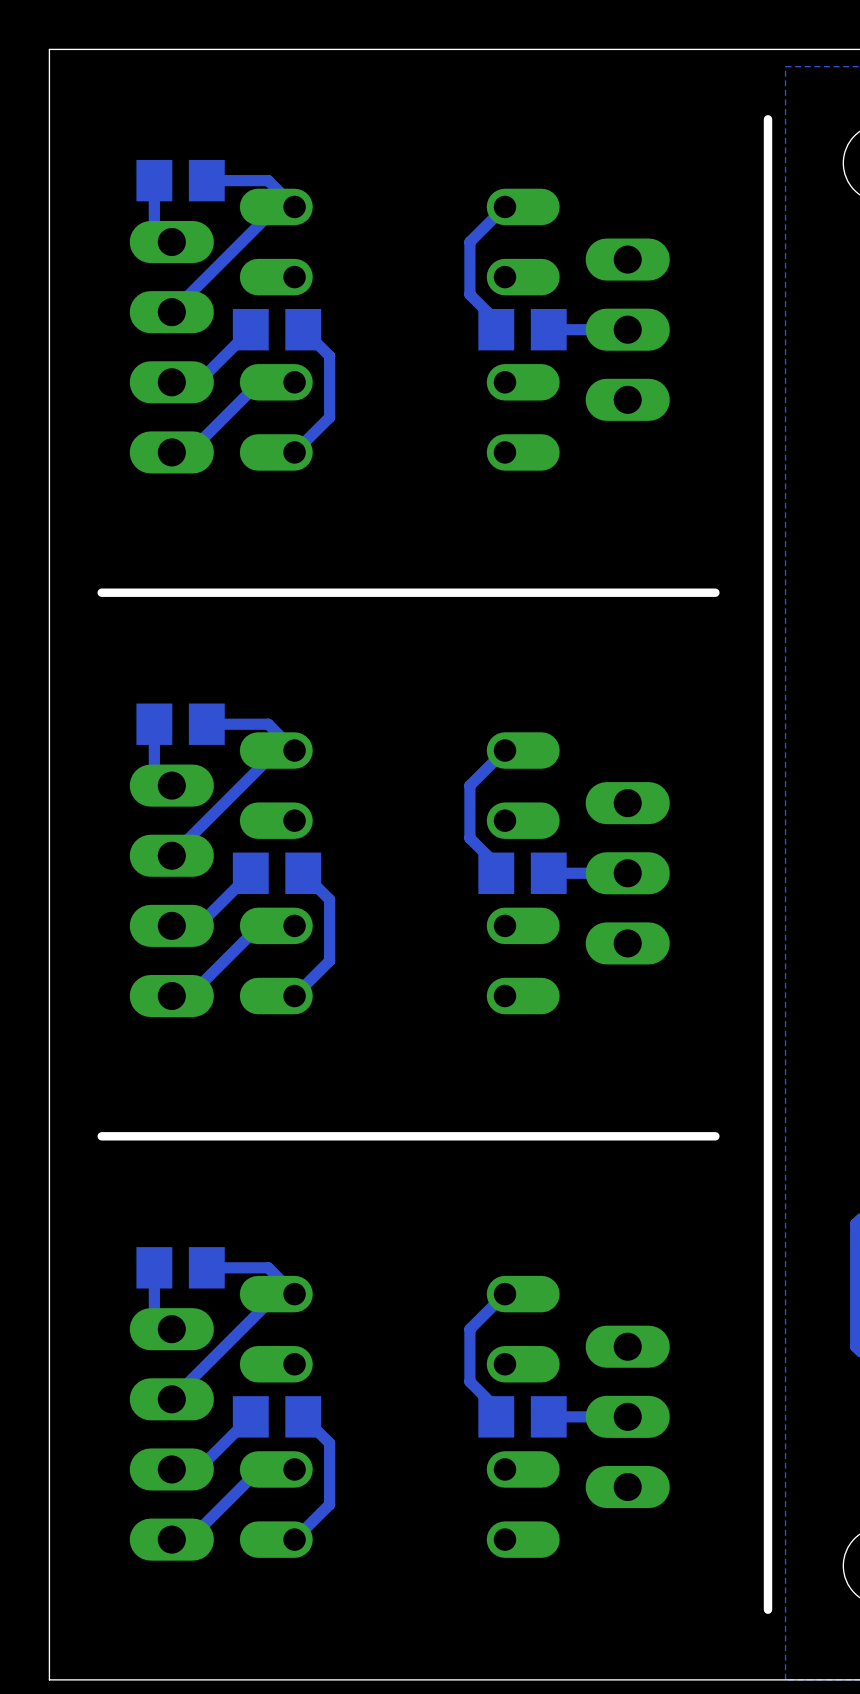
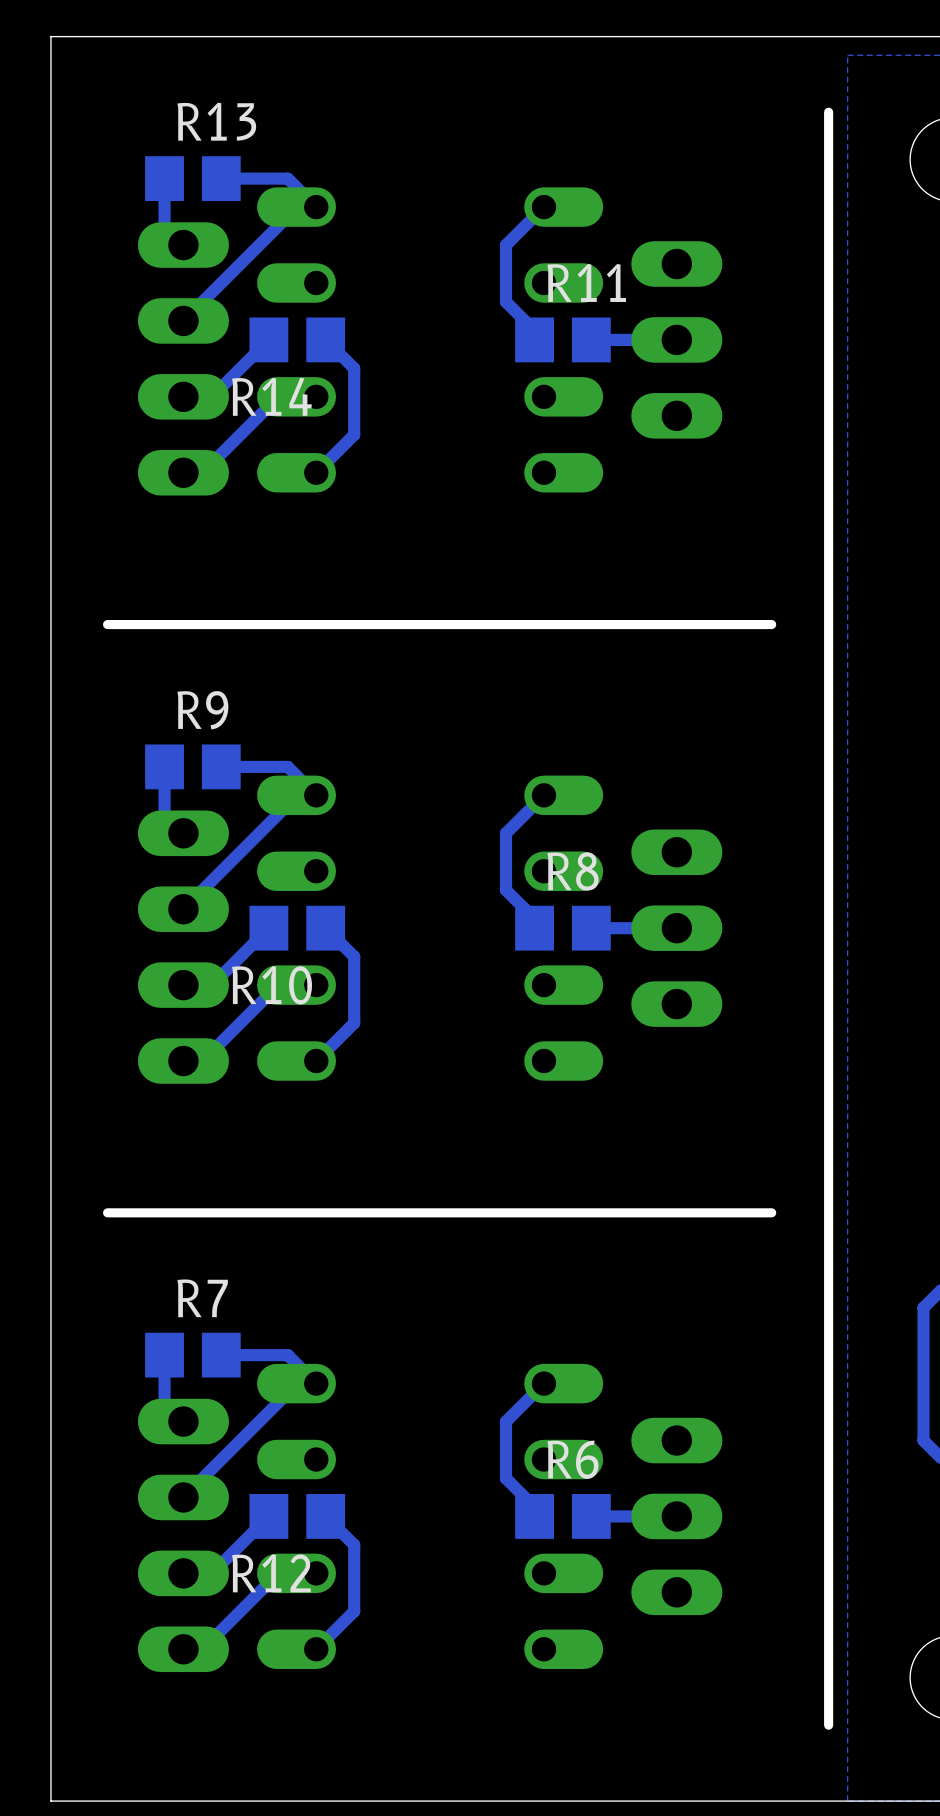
R13 name: none -> R13 (216, 121)
R11 name: none -> R11 (586, 282)
R14 name: none -> R14 (271, 396)
R9 name: none -> R9 (202, 710)
R8 name: none -> R8 (573, 871)
R10 name: none -> R10 (272, 985)
R7 name: none -> R7 (202, 1298)
R6 name: none -> R6 (573, 1459)
R12 name: none -> R12 (271, 1573)

